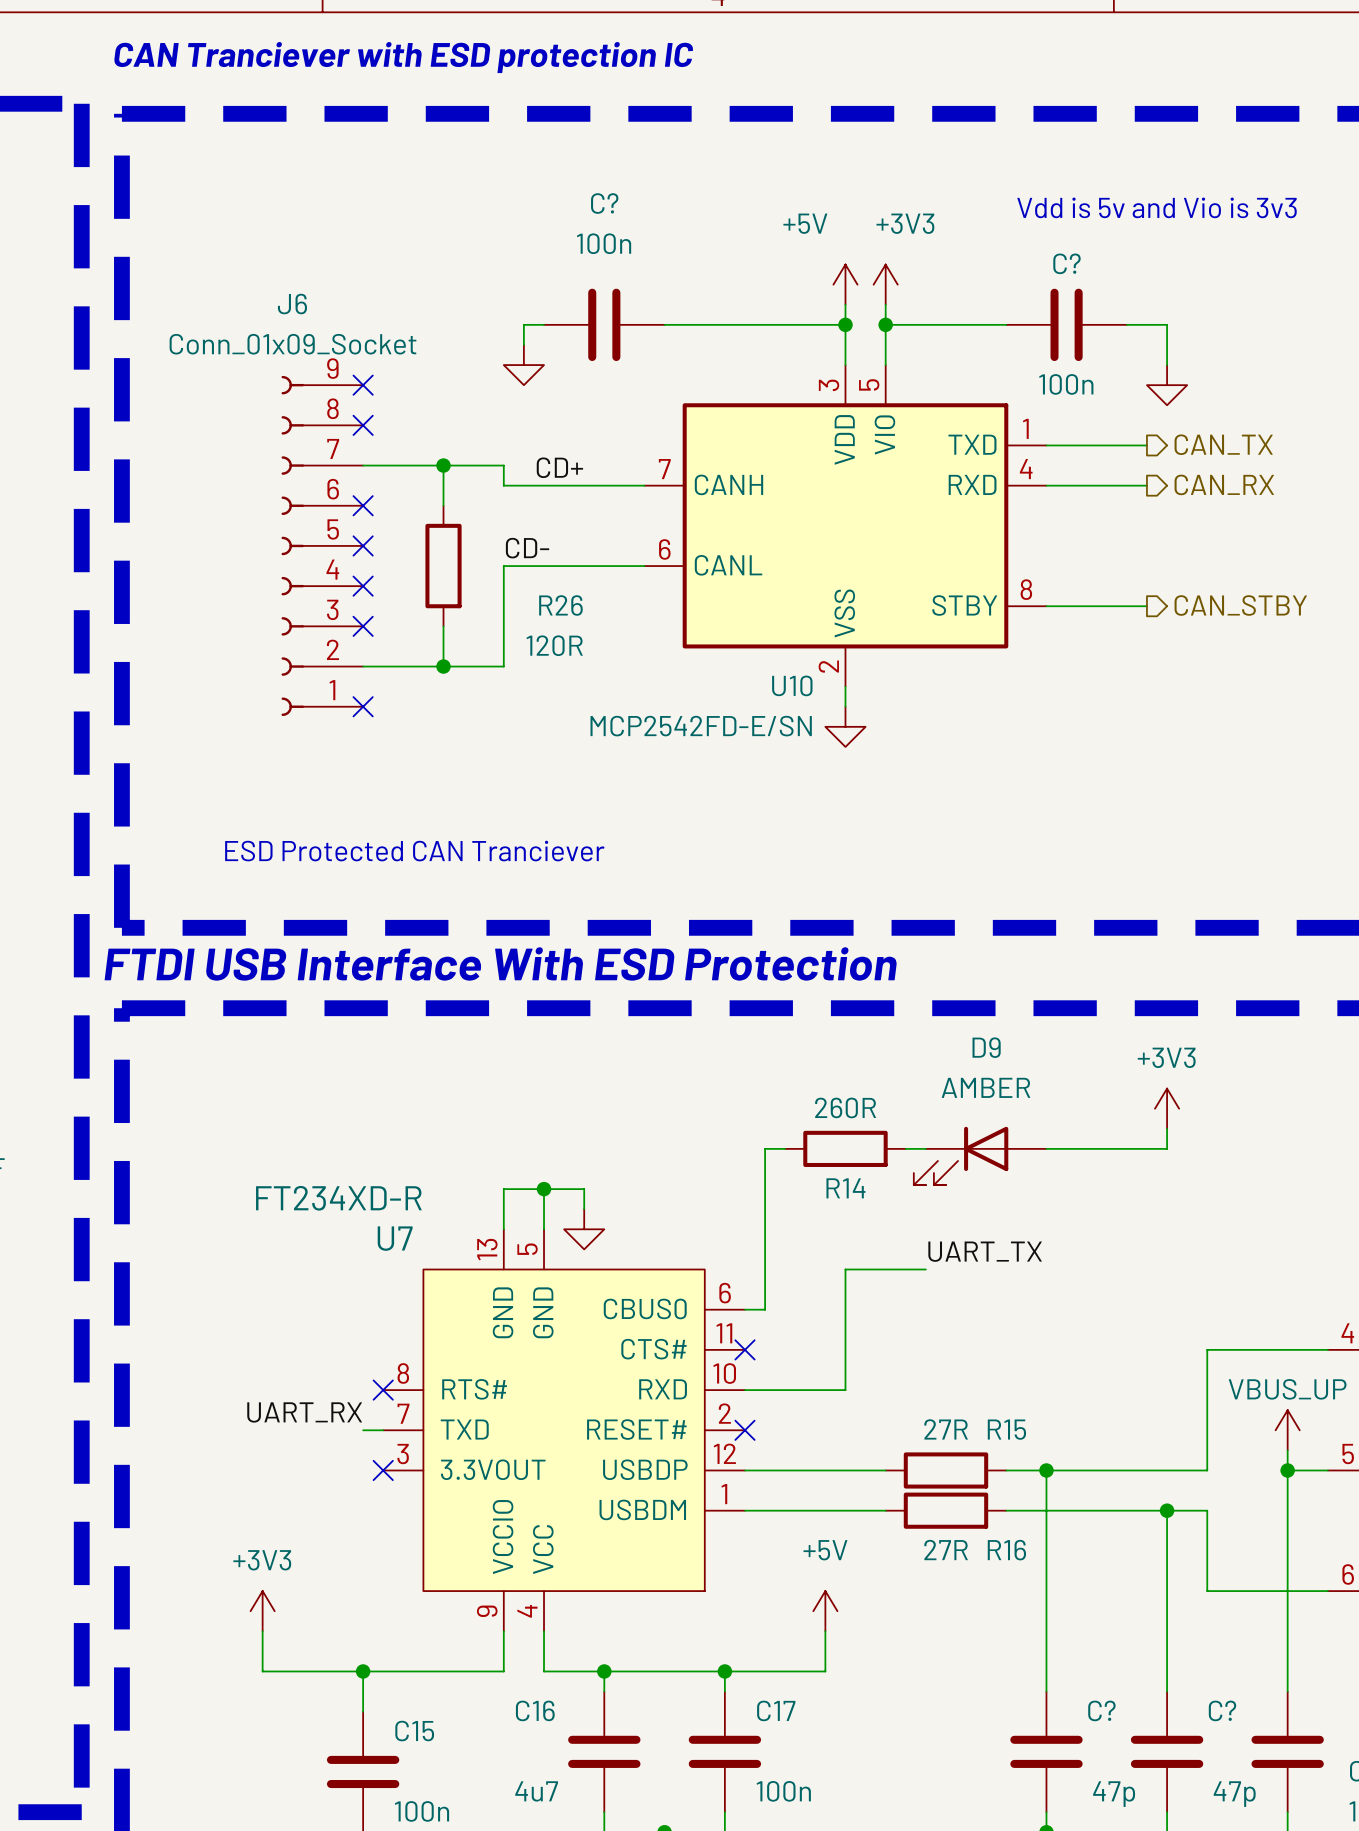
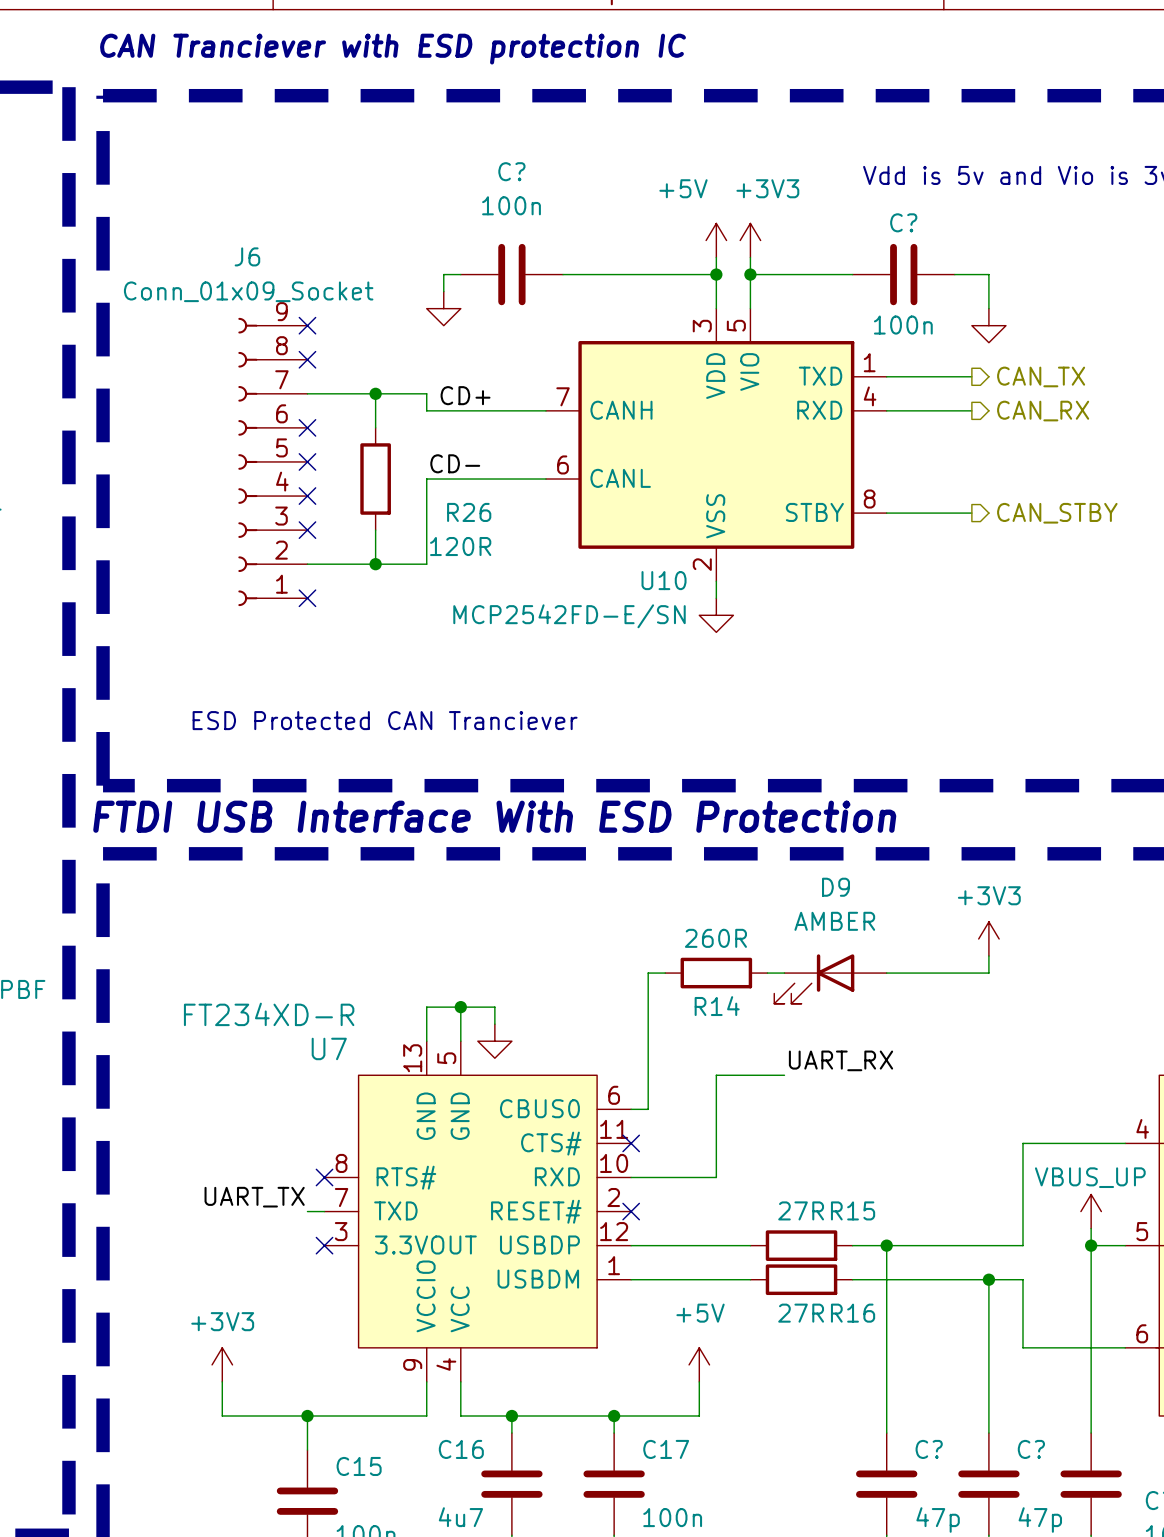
label: UART_TX (985, 1251) -> UART_RX (841, 1060)
label: UART_RX (304, 1412) -> UART_TX (254, 1197)

